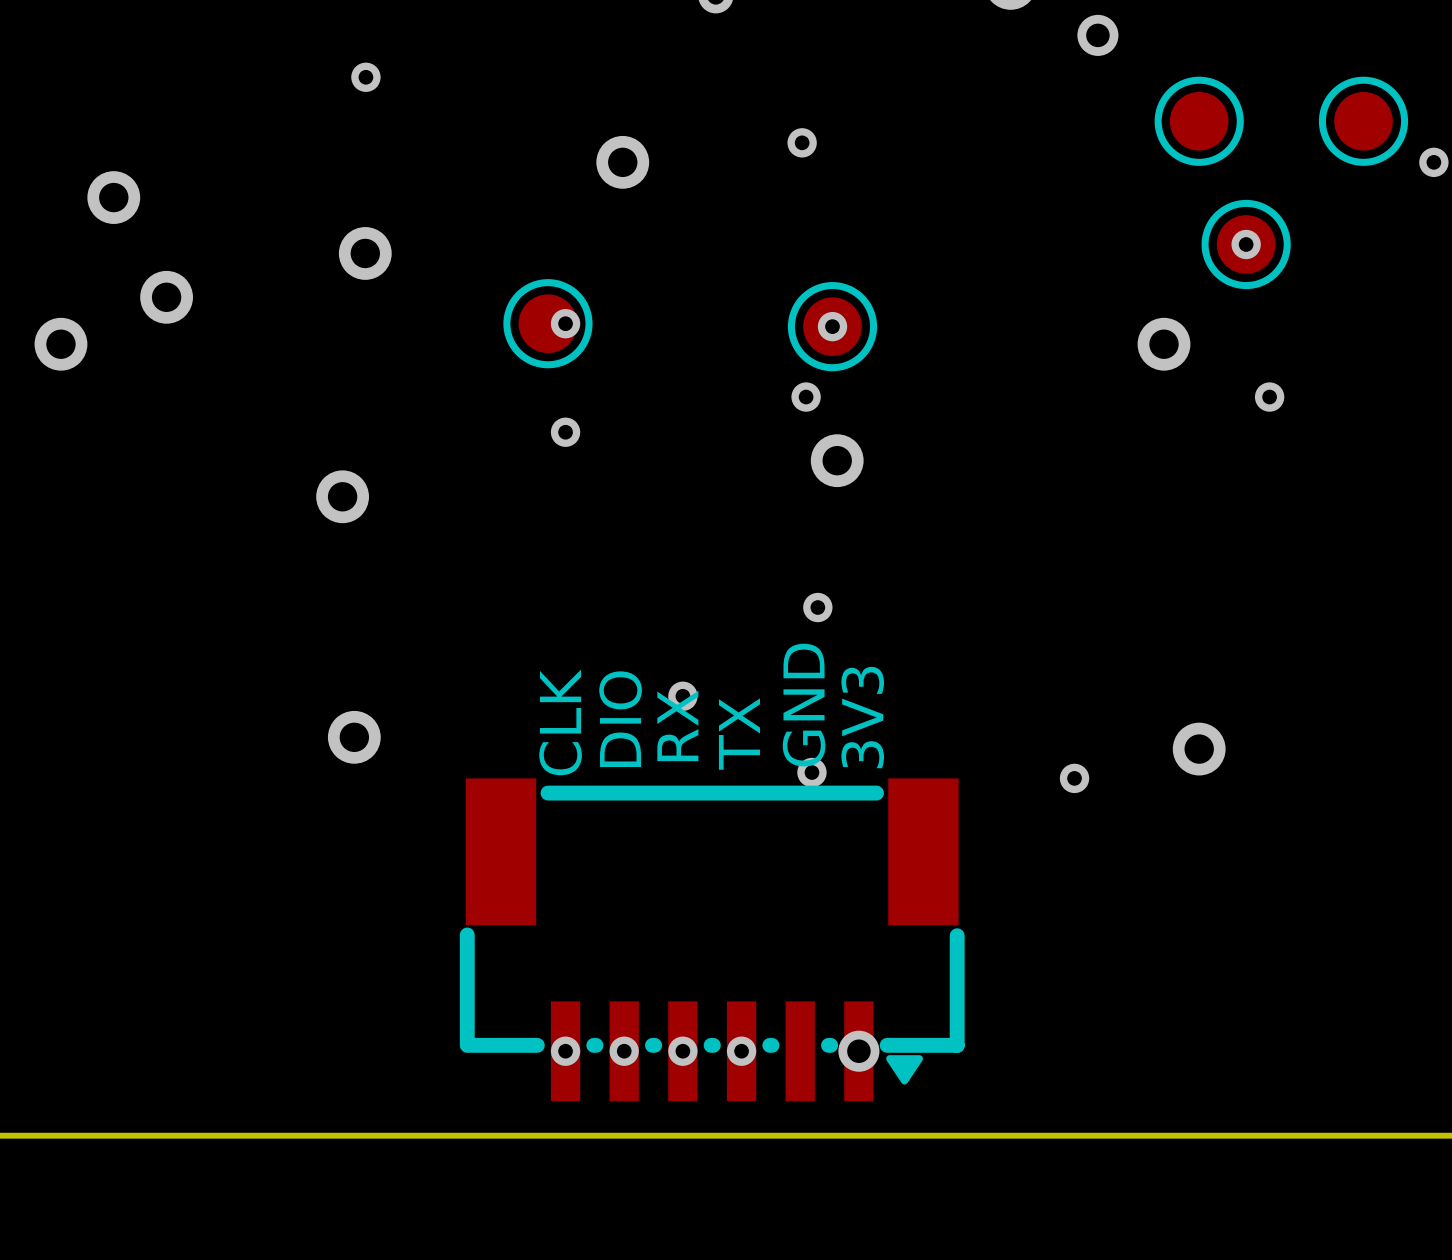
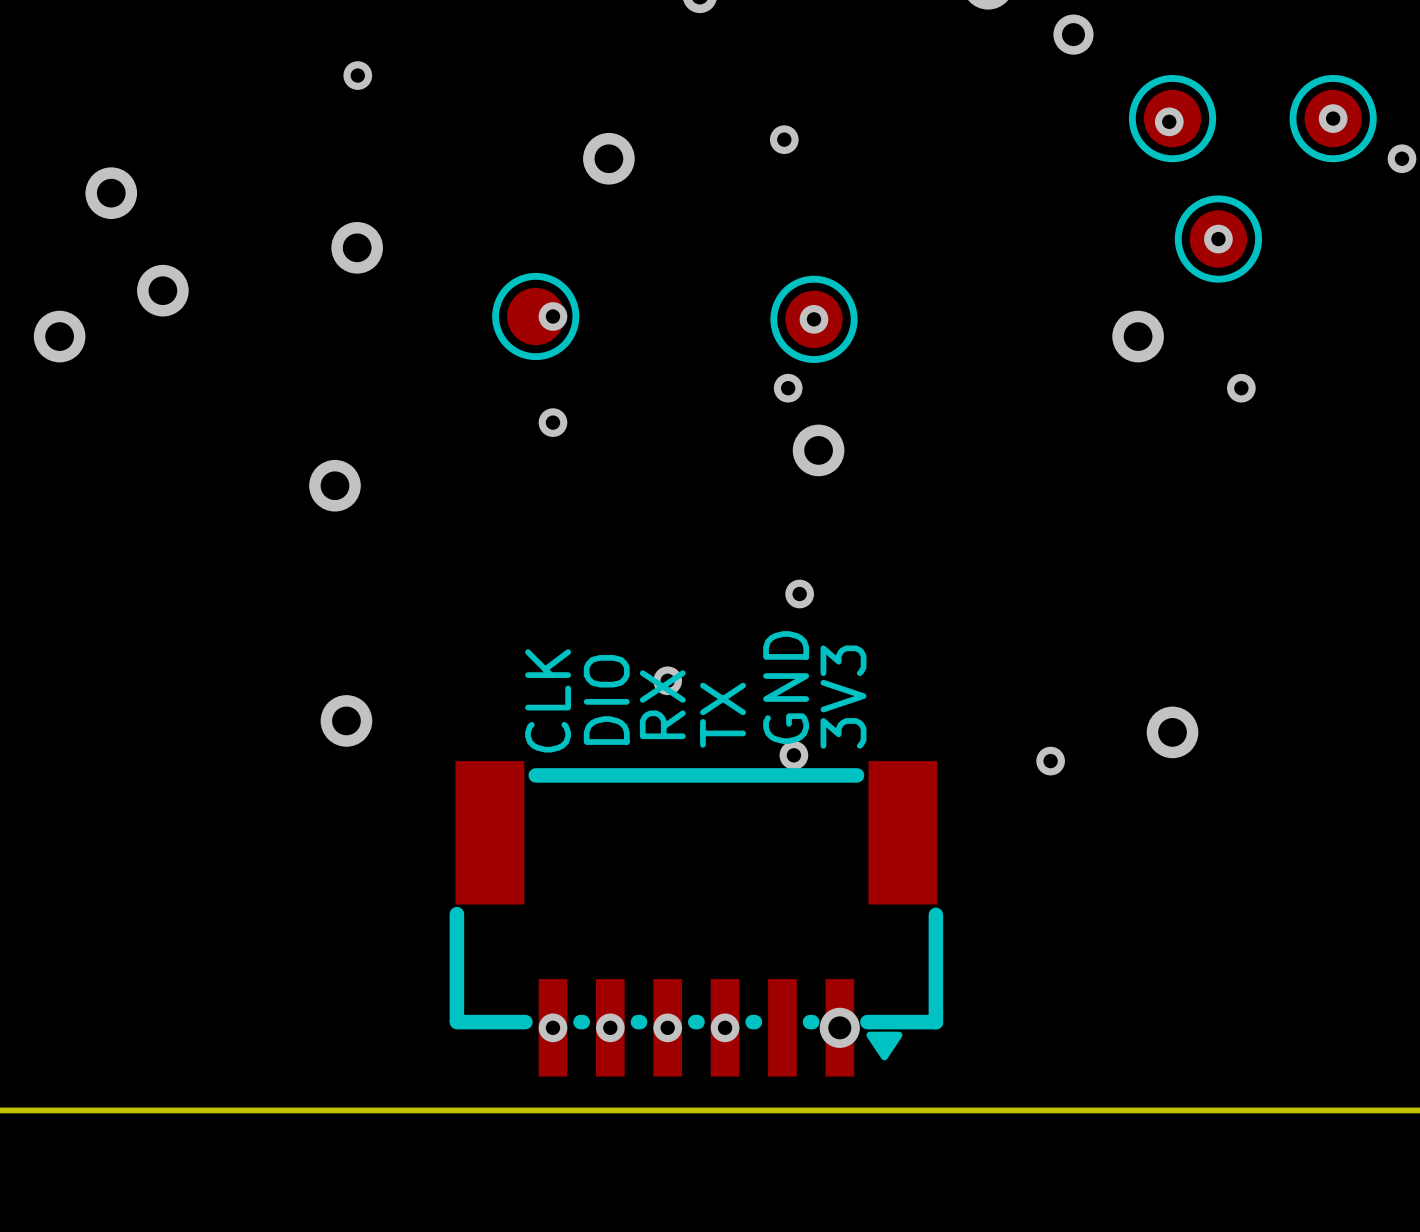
via: none -> (1333, 118)
via: none -> (1169, 121)

